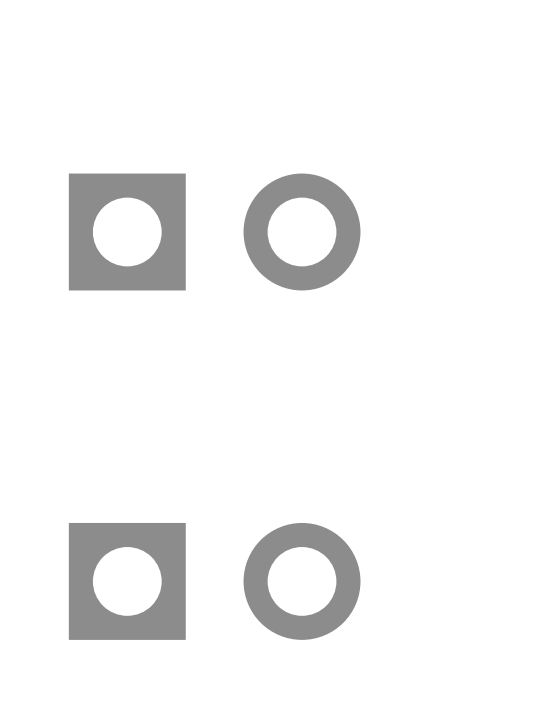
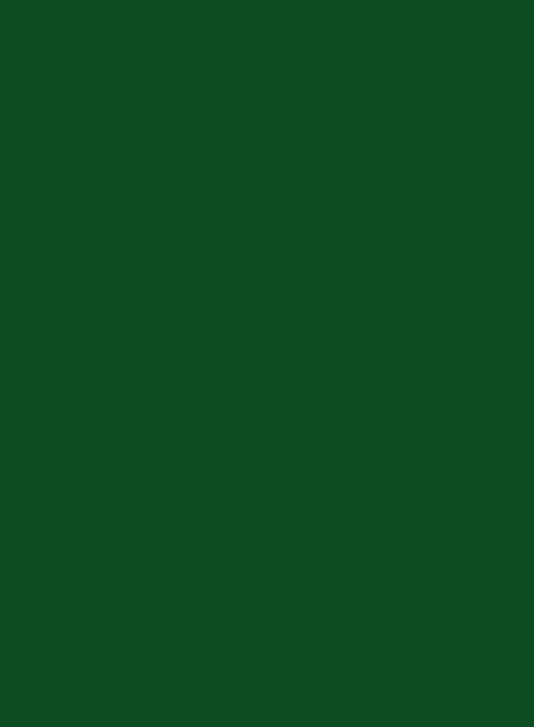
part: (214, 232) -> none
part: (214, 581) -> none

